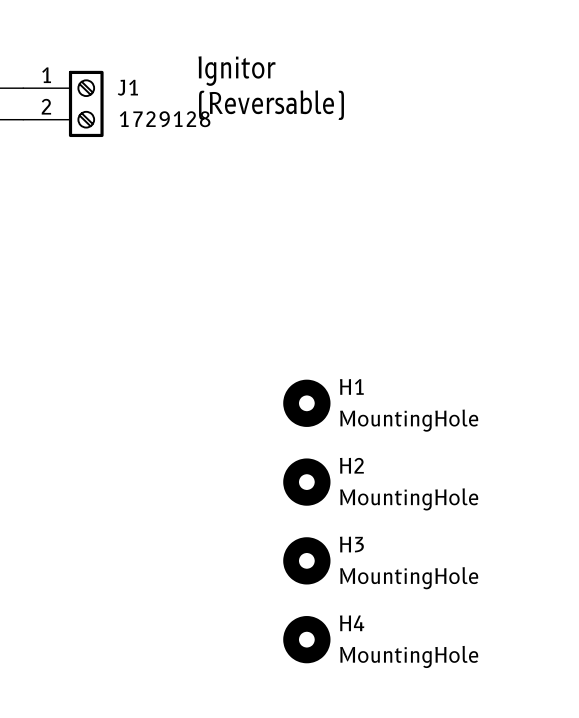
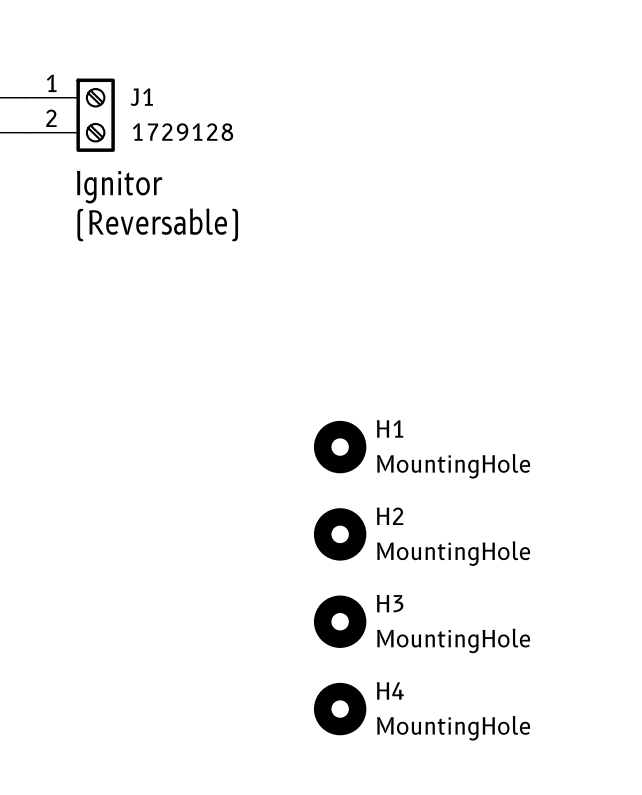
text position: Ignitor (237, 71) -> Ignitor (119, 187)
text position: (Reversable) (271, 105) -> (Reversable) (157, 224)

